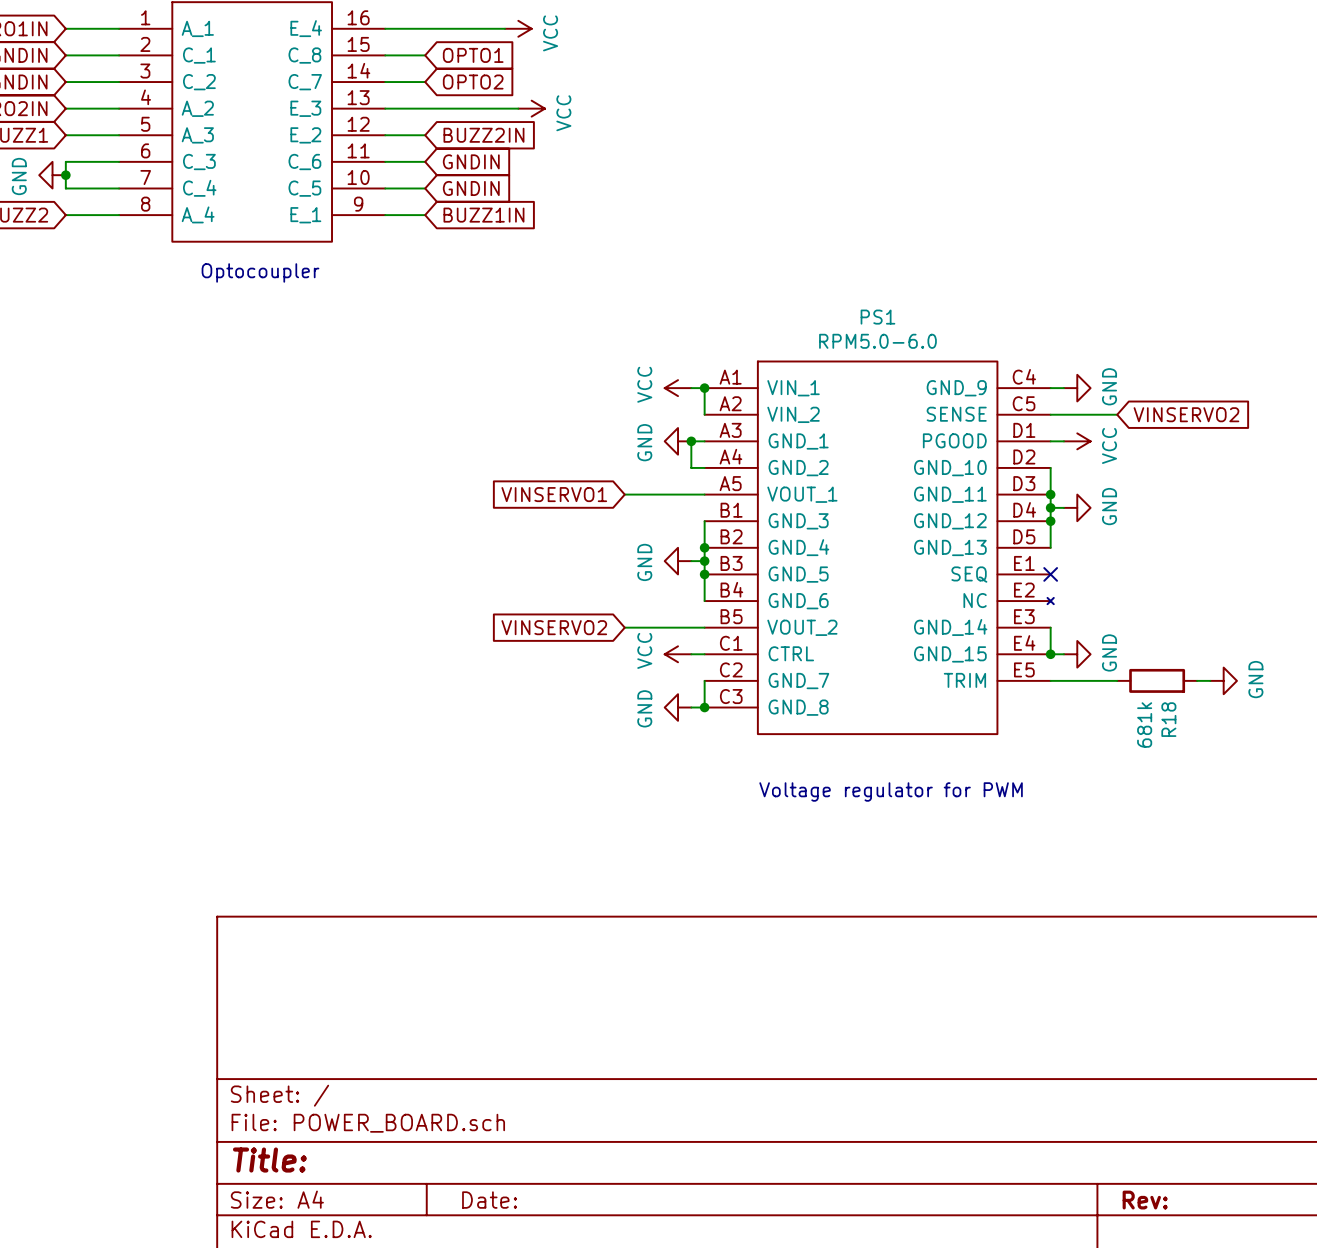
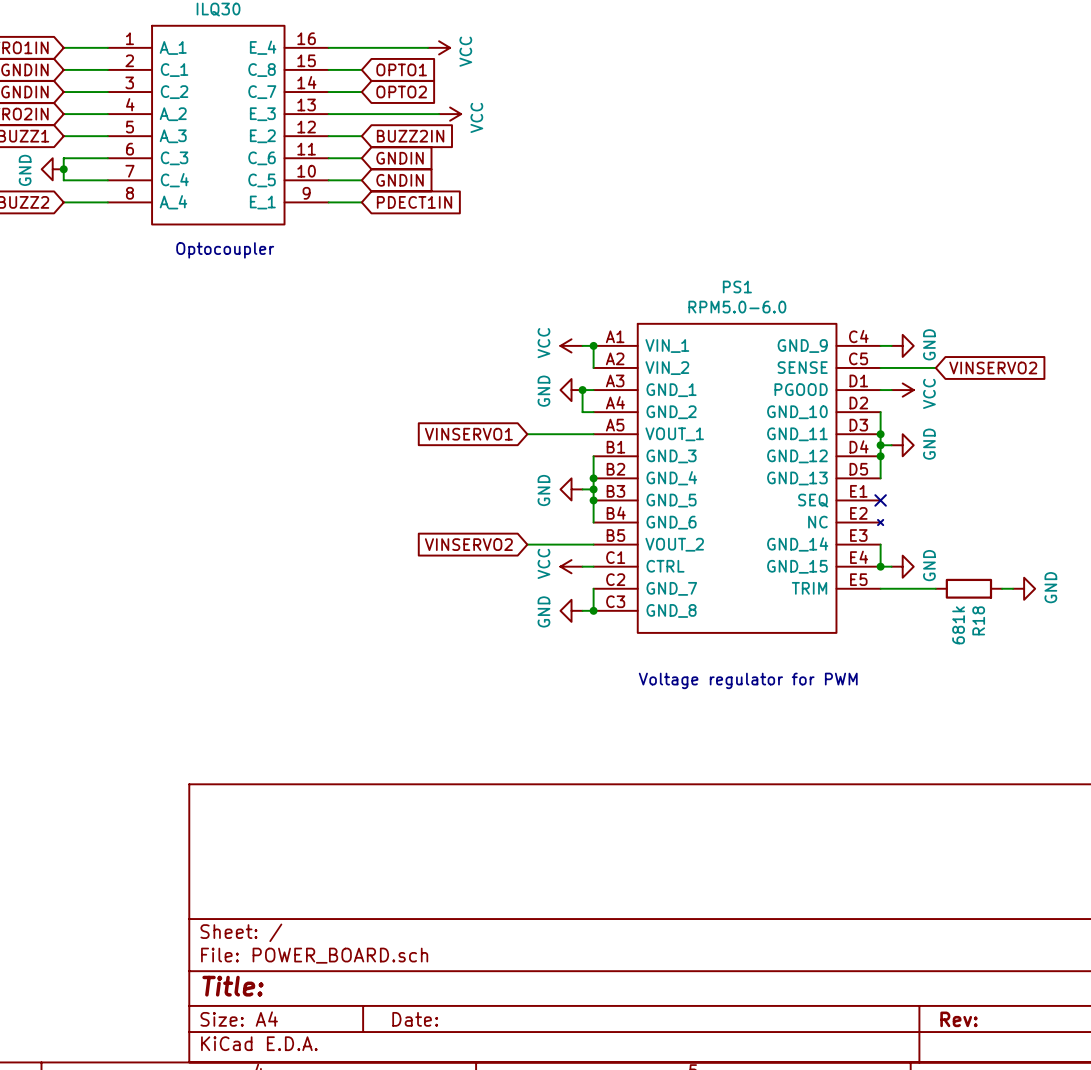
global label: BUZZ1IN (483, 215) -> PDECT1IN (414, 202)

